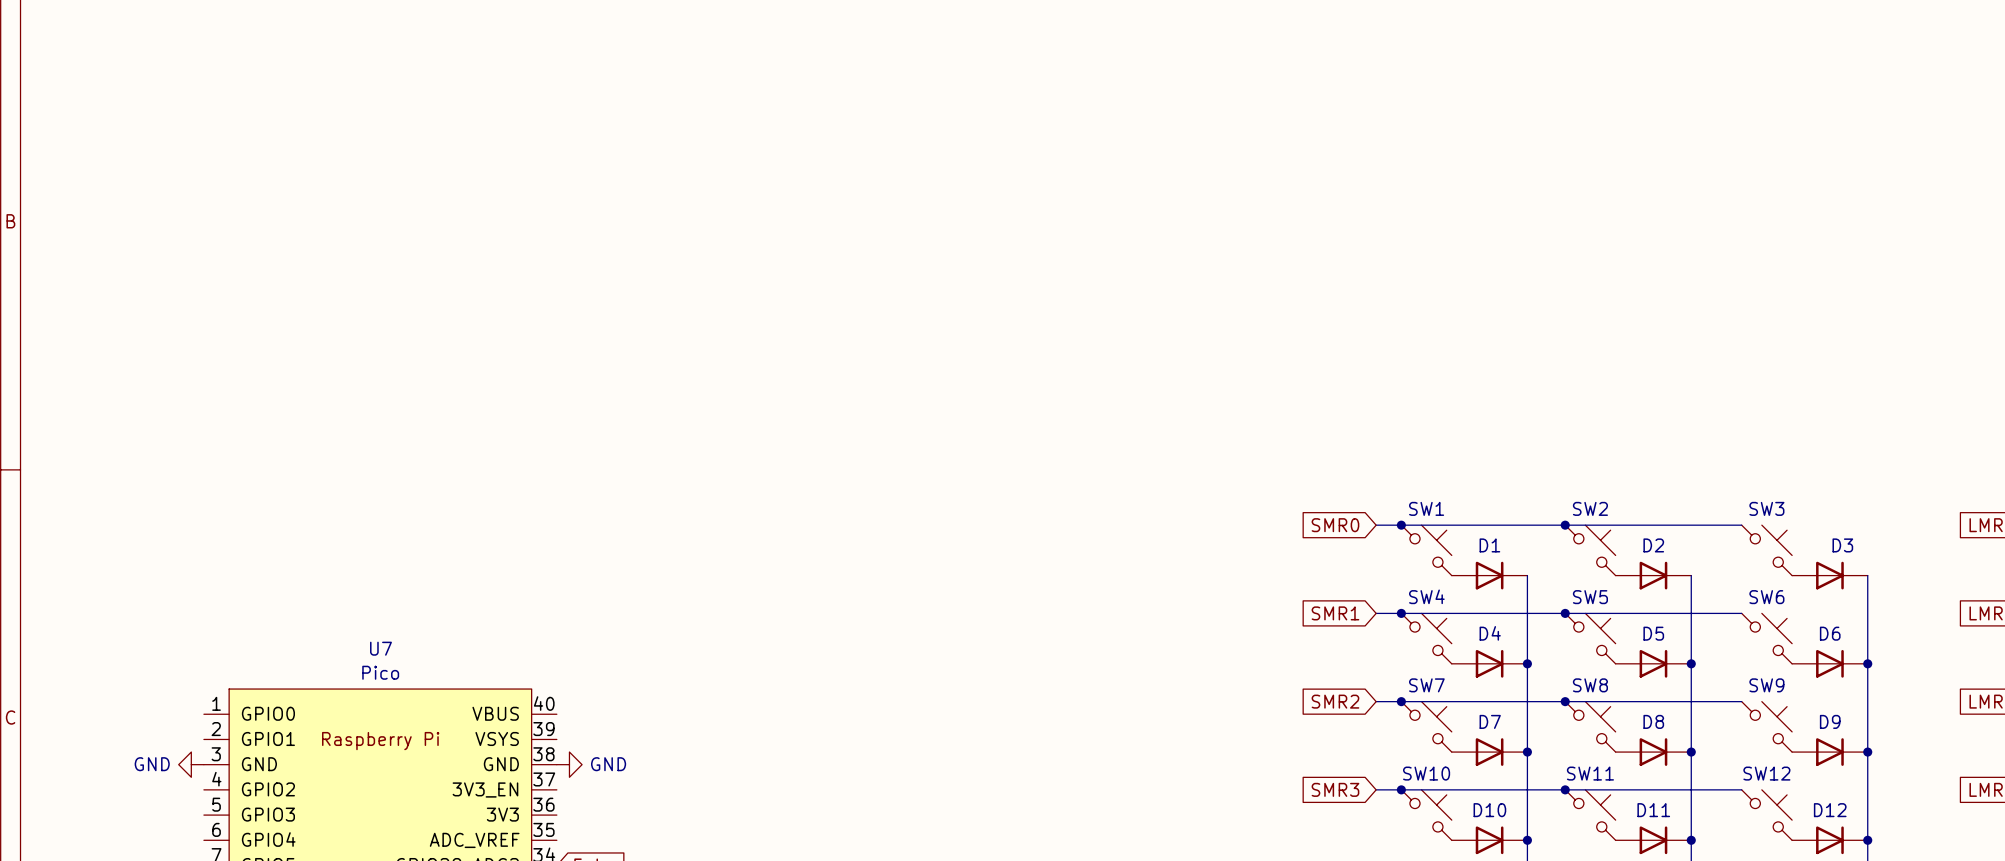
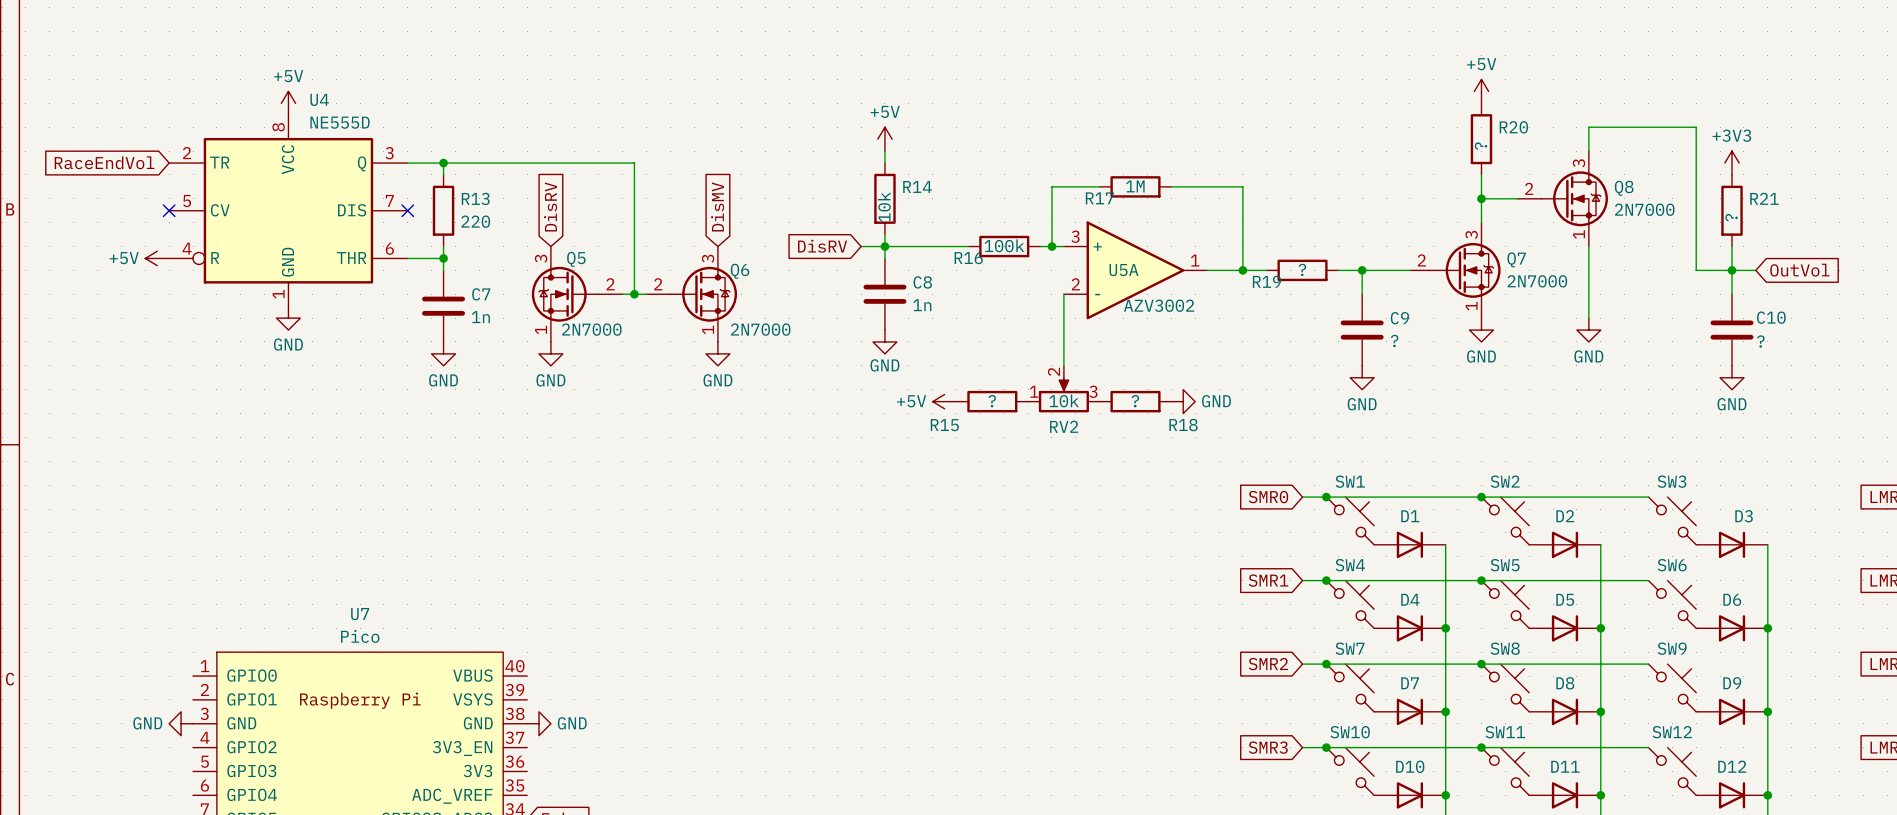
power symbol: none -> +5V (1481, 91)
power symbol: none -> +5V (288, 103)
power symbol: none -> +5V (884, 139)
R20: none -> ? (1481, 139)
wire: none -> (884, 151) (884, 163)
wire: none -> (1588, 151) (1588, 127) (1696, 127) (1696, 270) (1755, 270)
global label: none -> RaceEndVol (104, 162)
wire: none -> (407, 163) (634, 163) (634, 294)
wire: none -> (443, 163) (443, 174)
junction: none -> (443, 163)
power symbol: none -> +3V3 (1732, 163)
wire: none -> (1481, 174) (1481, 222)
wire: none -> (1099, 186) (1051, 186) (1051, 246)
R17: none -> 1M (1135, 186)
wire: none -> (1171, 186) (1242, 186) (1242, 270)
R14: none -> 10k (884, 198)
wire: none -> (1481, 198) (1517, 198)
junction: none -> (1481, 198)
Q8: none -> 2N7000 (1562, 198)
global label: none -> DisMV (717, 206)
global label: none -> DisRV (550, 206)
no-connect mark: none -> (169, 210)
U4: none -> NE555D (288, 210)
no-connect mark: none -> (407, 210)
R13: none -> 220 (443, 210)
R21: none -> ? (1732, 210)
wire: none -> (884, 234) (884, 258)
wire: none -> (443, 246) (443, 270)
global label: none -> DisRV (822, 246)
wire: none -> (861, 246) (968, 246)
junction: none -> (884, 246)
R16: none -> 100k (1004, 246)
wire: none -> (1040, 246) (1063, 246)
junction: none -> (1051, 246)
wire: none -> (1588, 246) (1588, 318)
wire: none -> (1732, 246) (1732, 294)
power symbol: none -> +5V (157, 258)
wire: none -> (407, 258) (443, 258)
junction: none -> (443, 258)
U5A: none -> AZV3002 (1135, 270)
wire: none -> (1207, 270) (1266, 270)
junction: none -> (1242, 270)
R19: none -> ? (1302, 270)
wire: none -> (1338, 270) (1409, 270)
wire: none -> (1362, 270) (1362, 294)
junction: none -> (1362, 270)
Q7: none -> 2N7000 (1455, 270)
junction: none -> (1732, 270)
global label: none -> OutVol (1799, 270)
Q5: none -> 2N7000 (577, 294)
wire: none -> (622, 294) (646, 294)
junction: none -> (634, 294)
Q6: none -> 2N7000 (691, 294)
C8: none -> 1n (884, 294)
wire: none -> (1063, 294) (1063, 365)
C7: none -> 1n (443, 306)
power symbol: none -> GND (288, 318)
C9: none -> ? (1362, 330)
power symbol: none -> GND (1481, 330)
power symbol: none -> GND (1588, 330)
C10: none -> ? (1732, 330)
power symbol: none -> GND (884, 341)
power symbol: none -> GND (443, 353)
power symbol: none -> GND (550, 353)
power symbol: none -> GND (717, 353)
power symbol: none -> GND (1362, 377)
power symbol: none -> GND (1732, 377)
RV2: none -> 10k (1063, 389)
power symbol: none -> +5V (944, 401)
R15: none -> ? (992, 401)
R18: none -> ? (1135, 401)
power symbol: none -> GND (1183, 401)

